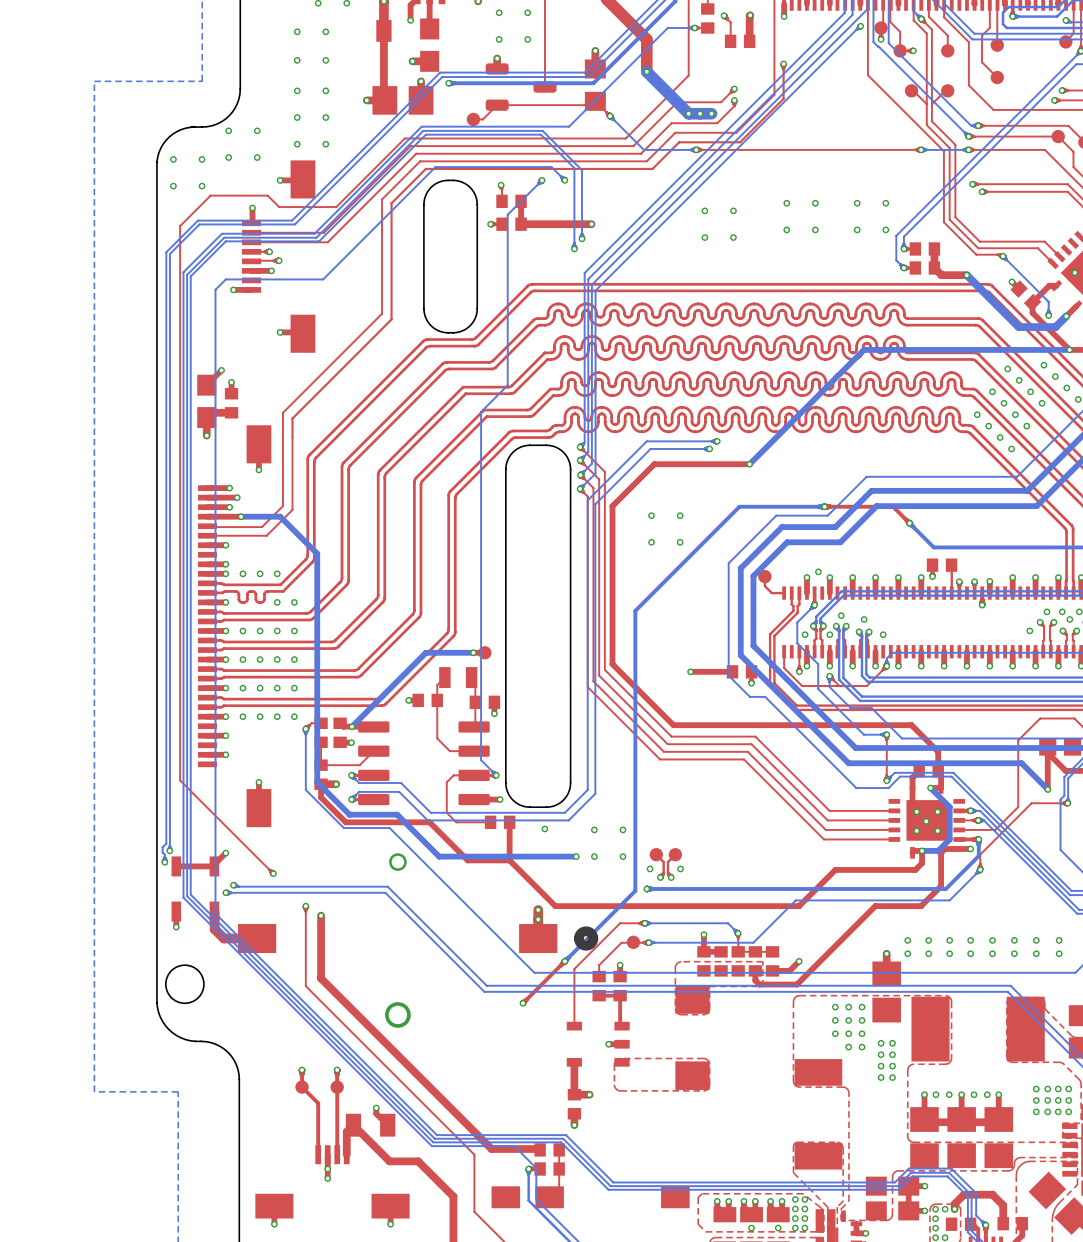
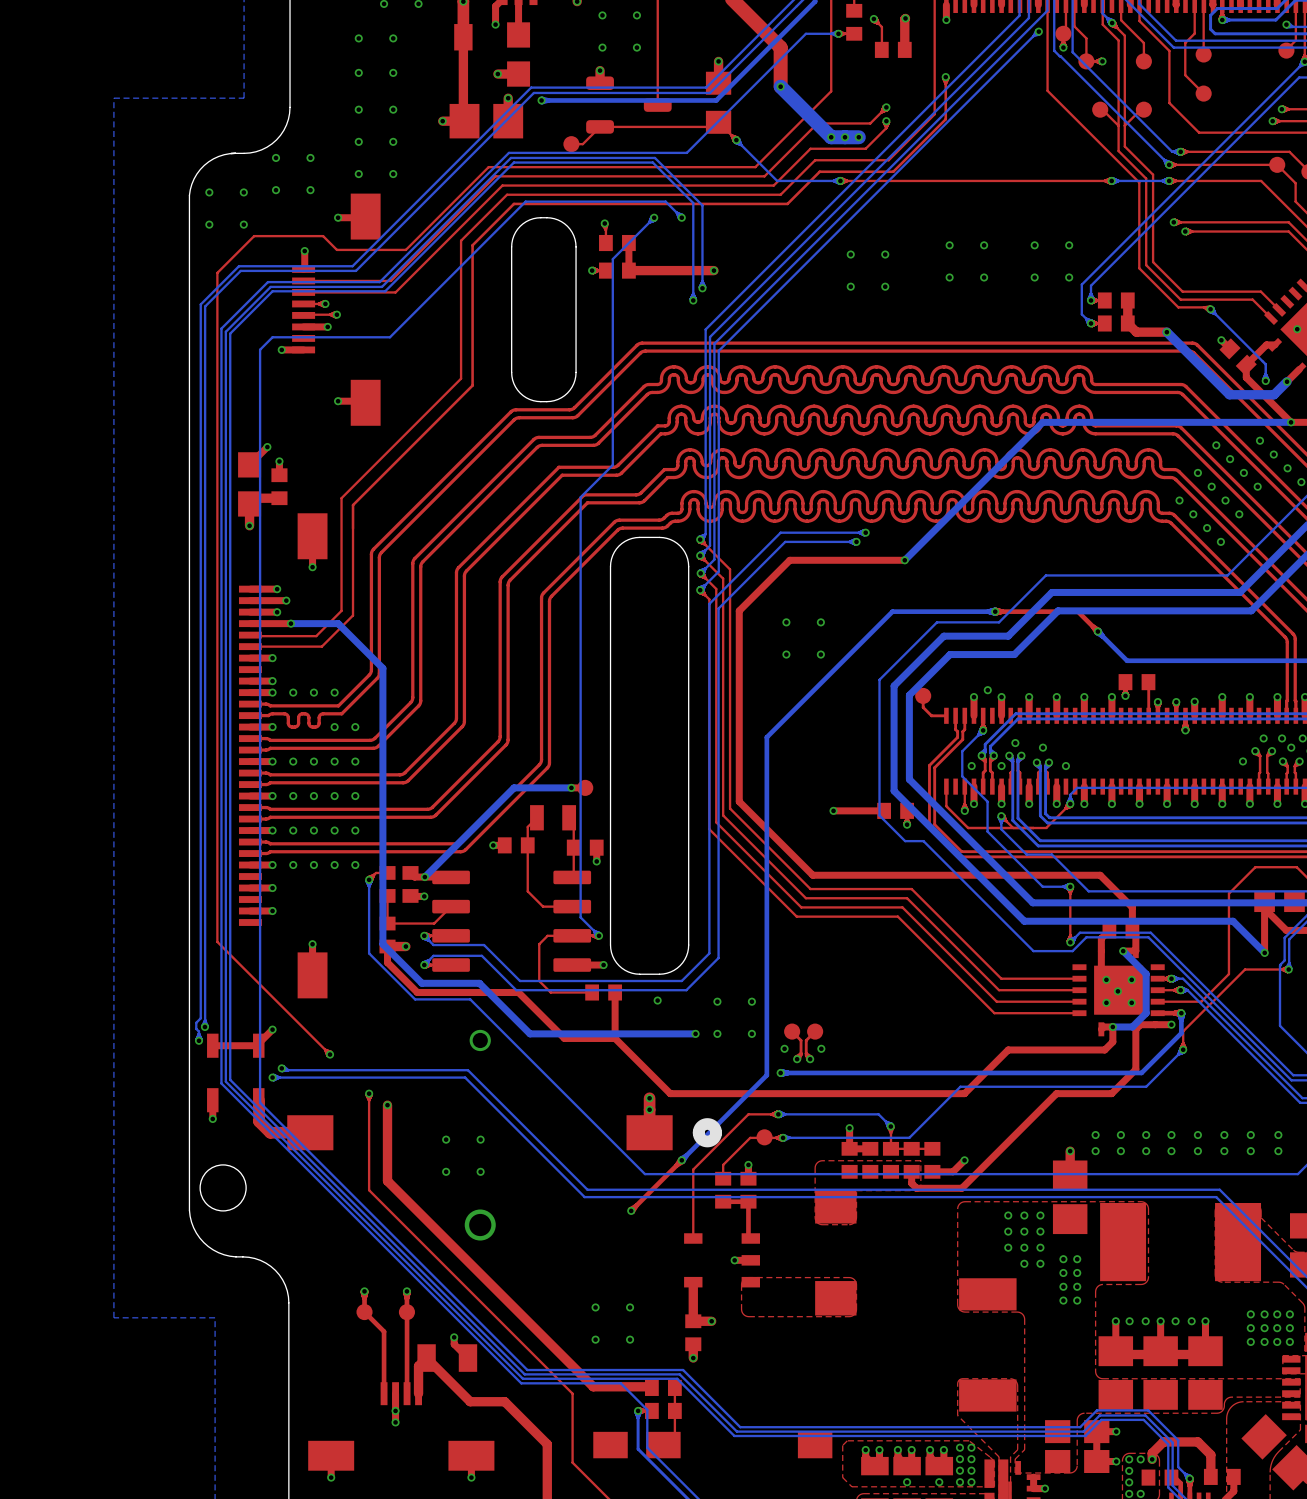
via: none -> (446, 1139)
via: none -> (480, 1139)
via: none -> (446, 1171)
via: none -> (480, 1171)
via: none -> (595, 1307)
via: none -> (630, 1307)
via: none -> (595, 1339)
via: none -> (630, 1339)

